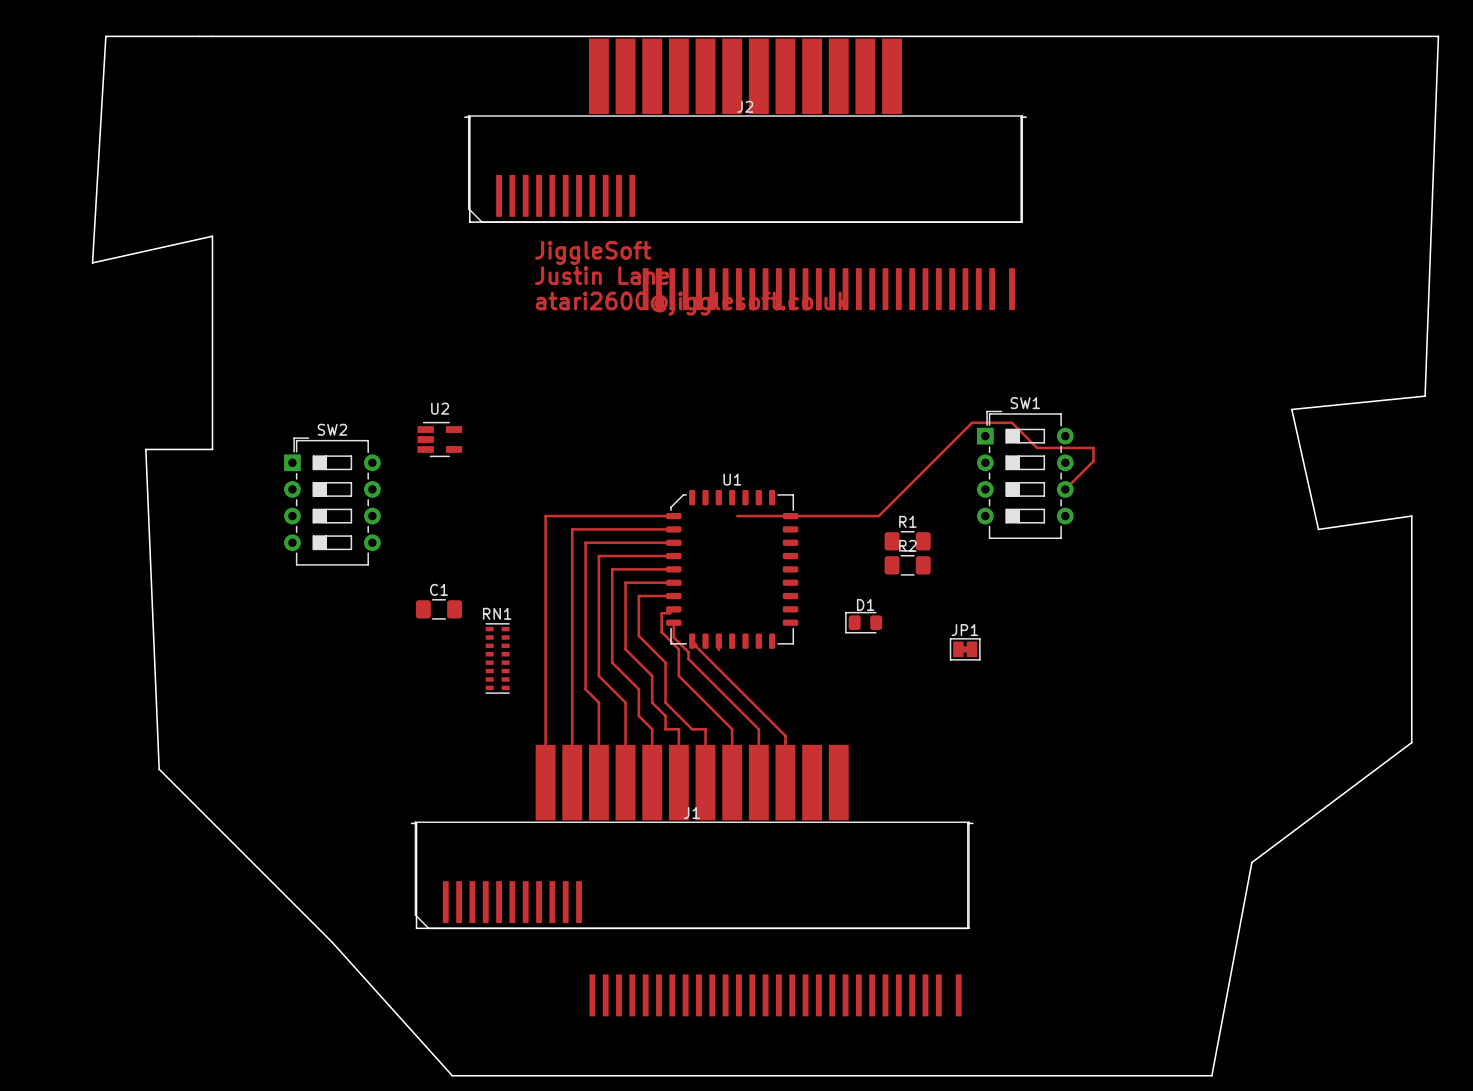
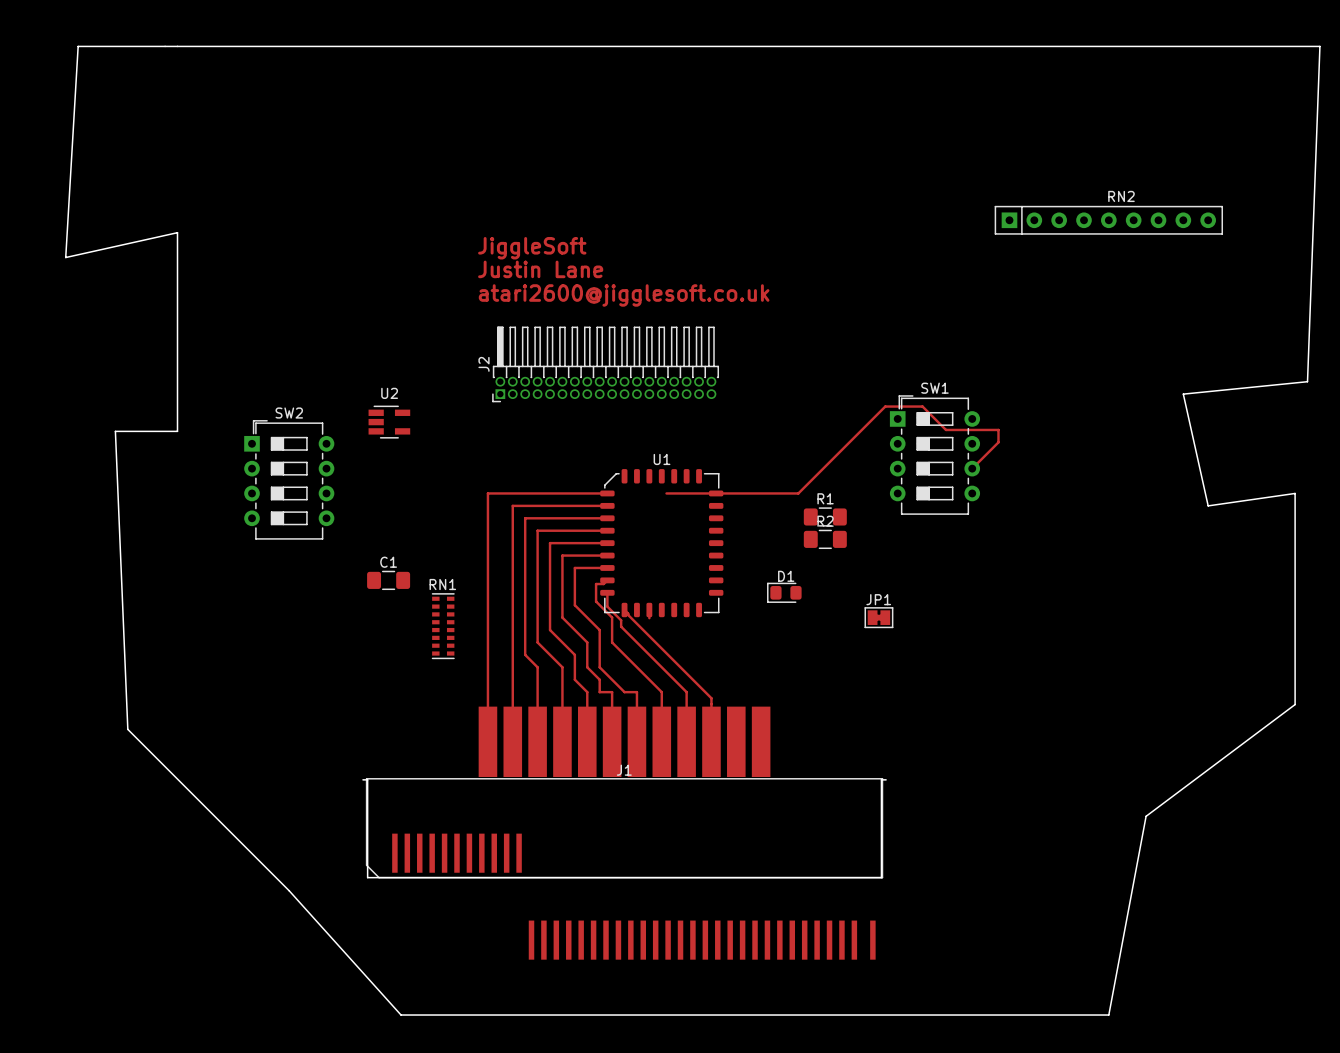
J2 footprint: [464, 38, 1027, 311] -> [492, 326, 719, 403]
J2 name position: J2 (745, 106) -> J2 (484, 364)
RN2: none -> (1108, 220)

